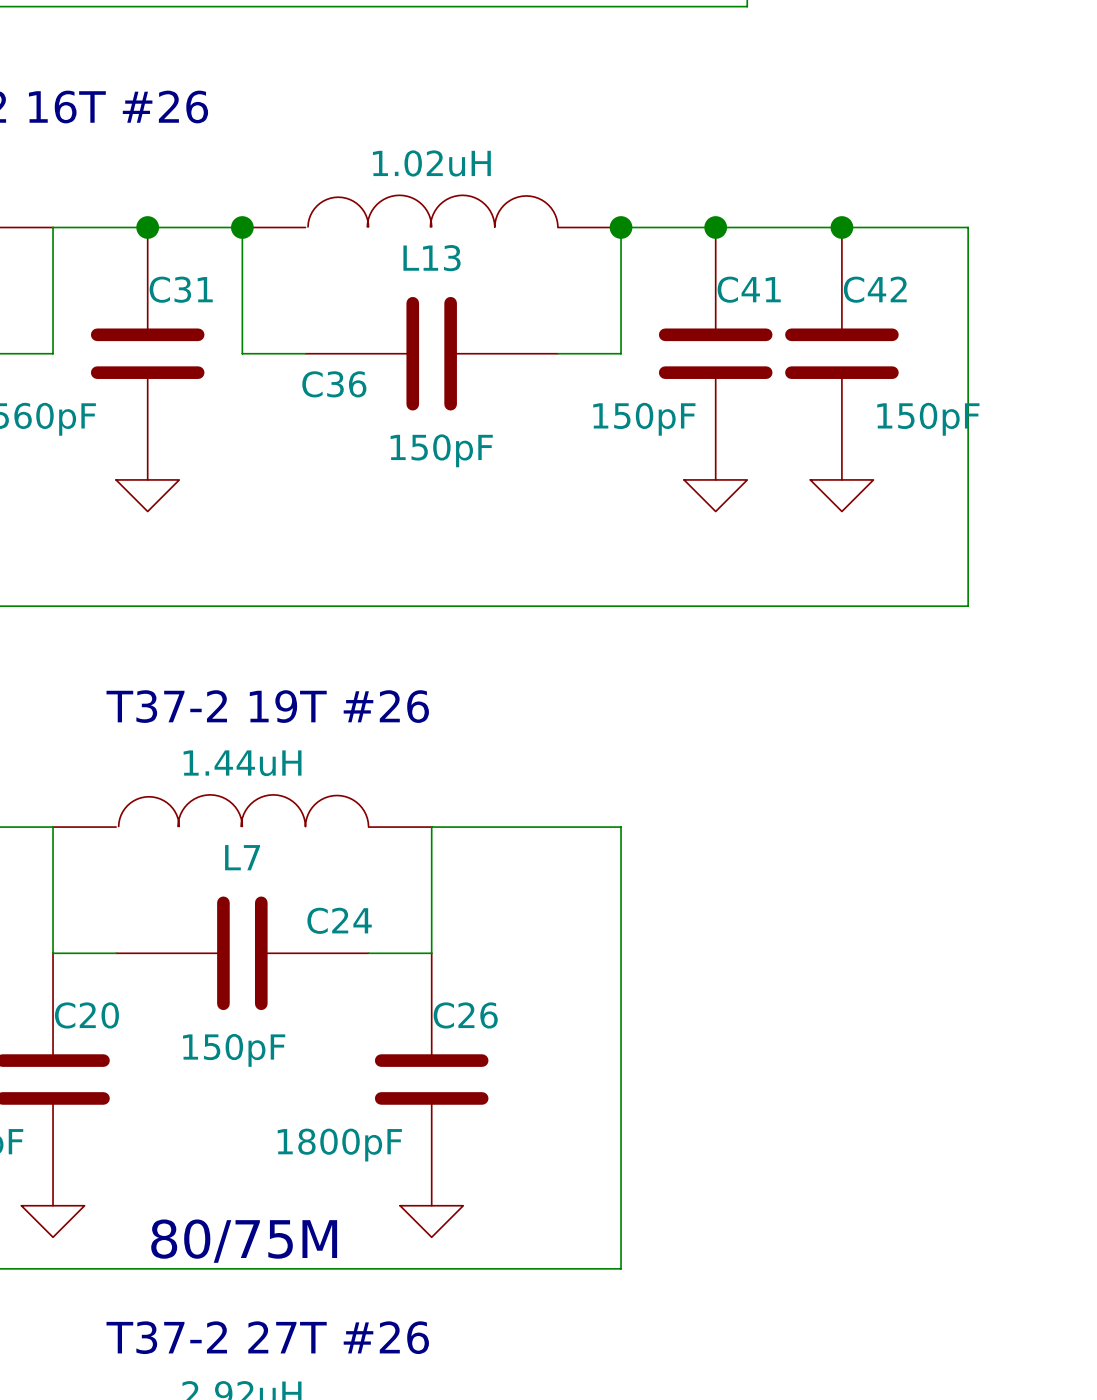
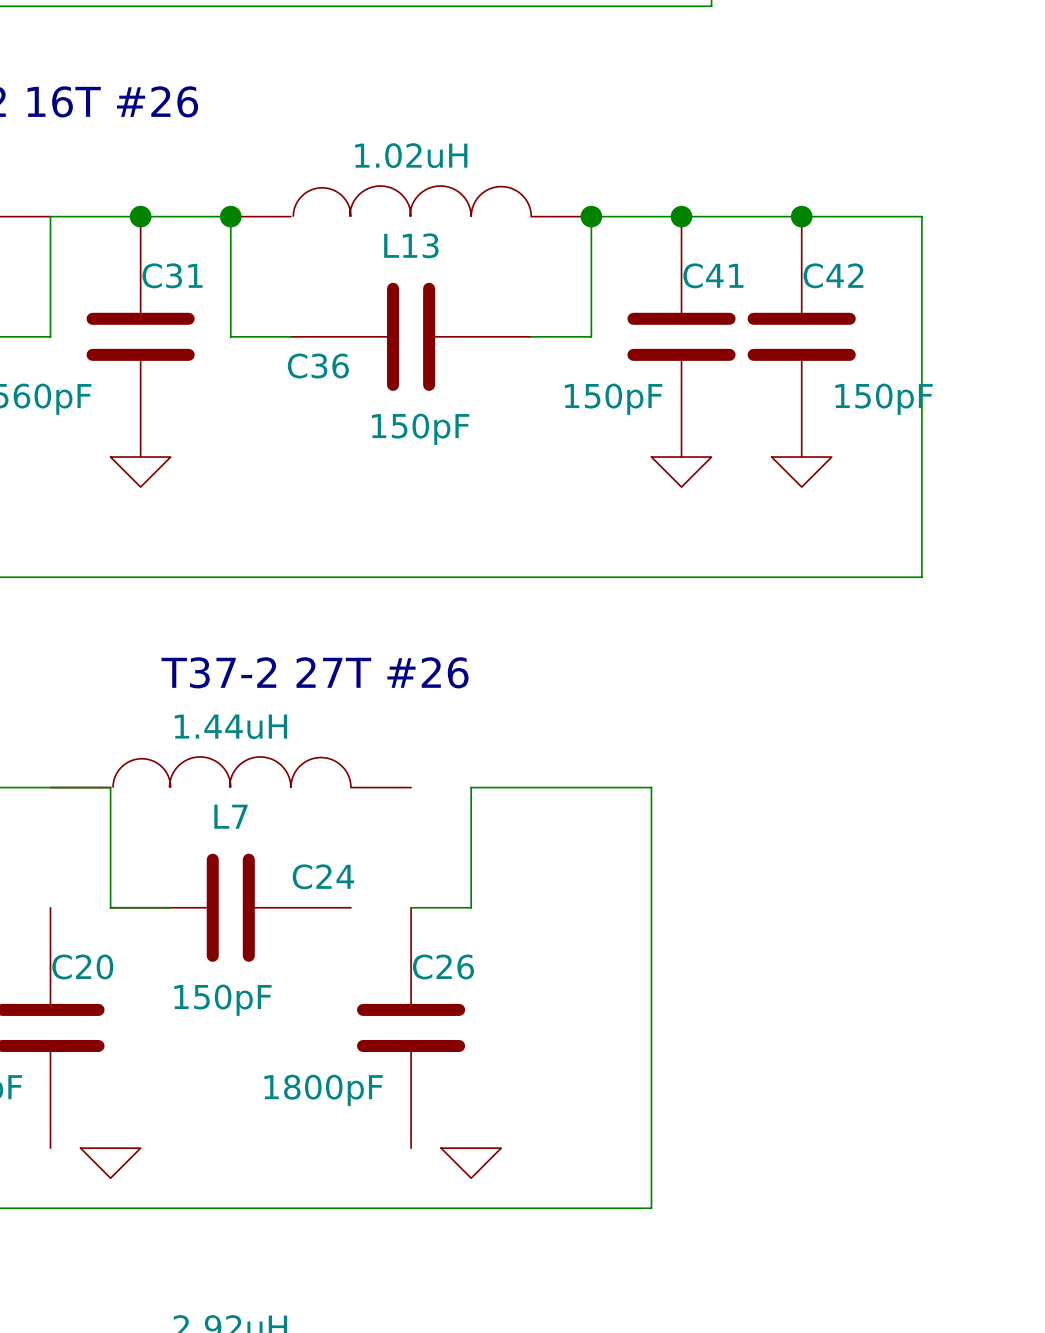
text: T37-2 19T #26 (267, 706) -> T37-2 27T #26 (315, 672)
wire: (53, 827) (53, 953) (116, 953) -> (50, 787) (110, 787) (110, 907) (170, 907)
wire: (494, 827) (431, 827) (431, 953) (368, 953) -> (471, 787) (471, 907) (411, 907)
wire: (621, 827) (621, 1268) -> (591, 787) (651, 787) (651, 1208) (591, 1208)
power symbol position: (53, 1221) -> (110, 1163)
power symbol position: (431, 1221) -> (471, 1163)
text: 80/75M (244, 1241) -> none
text: T37-2 27T #26 (267, 1337) -> none

